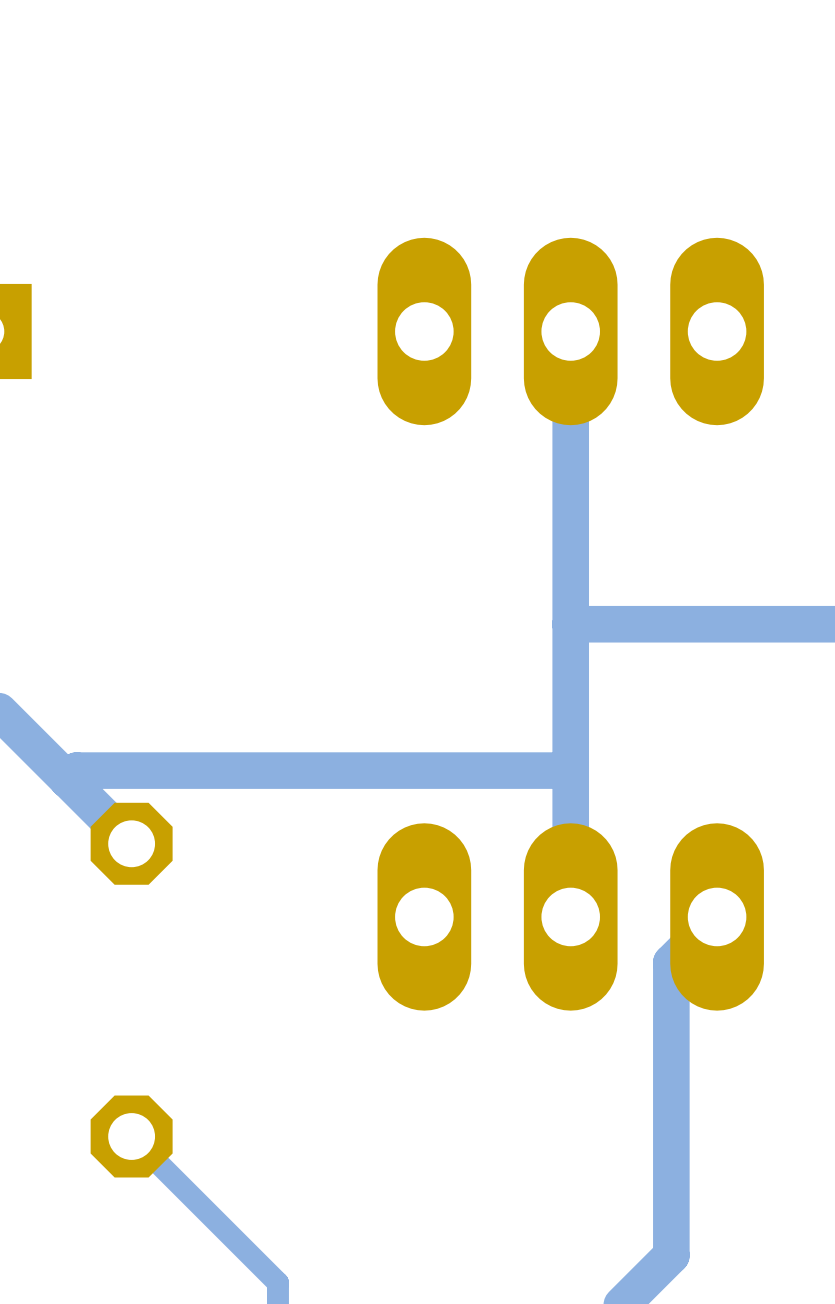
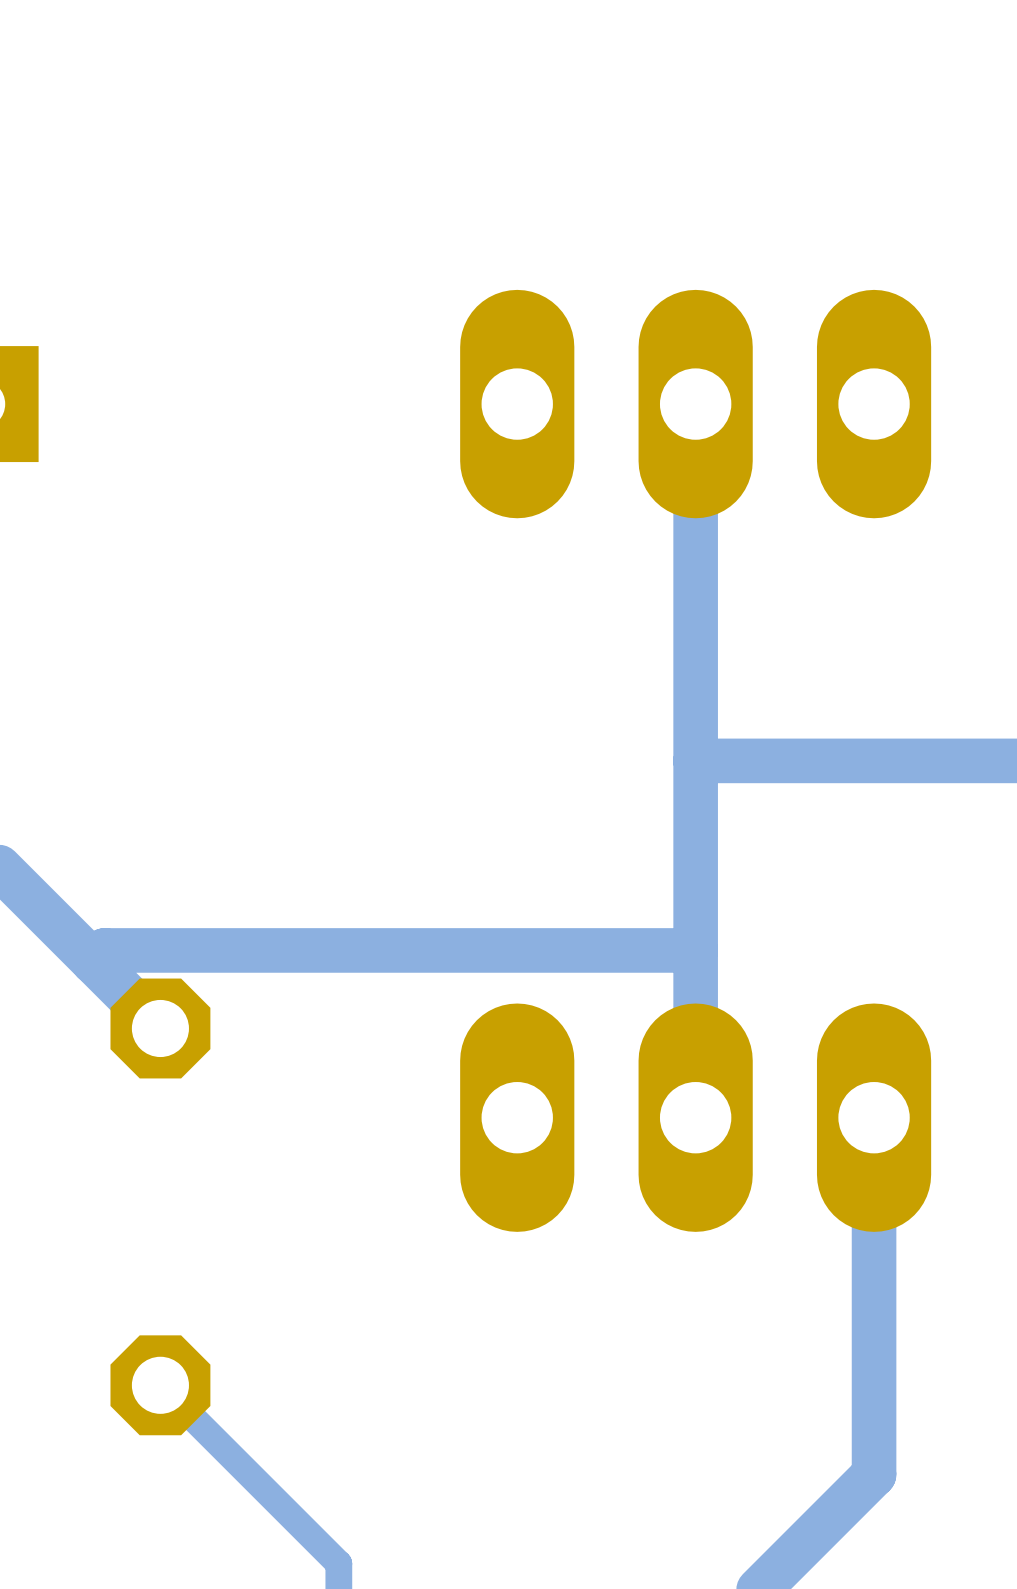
track: (570, 770) (76, 770) (67, 779) -> none
track: none -> (695, 950) (104, 950) (93, 961)
track: (717, 916) (671, 962) (671, 1255) -> (874, 1117) (874, 1474) (818, 1530)

